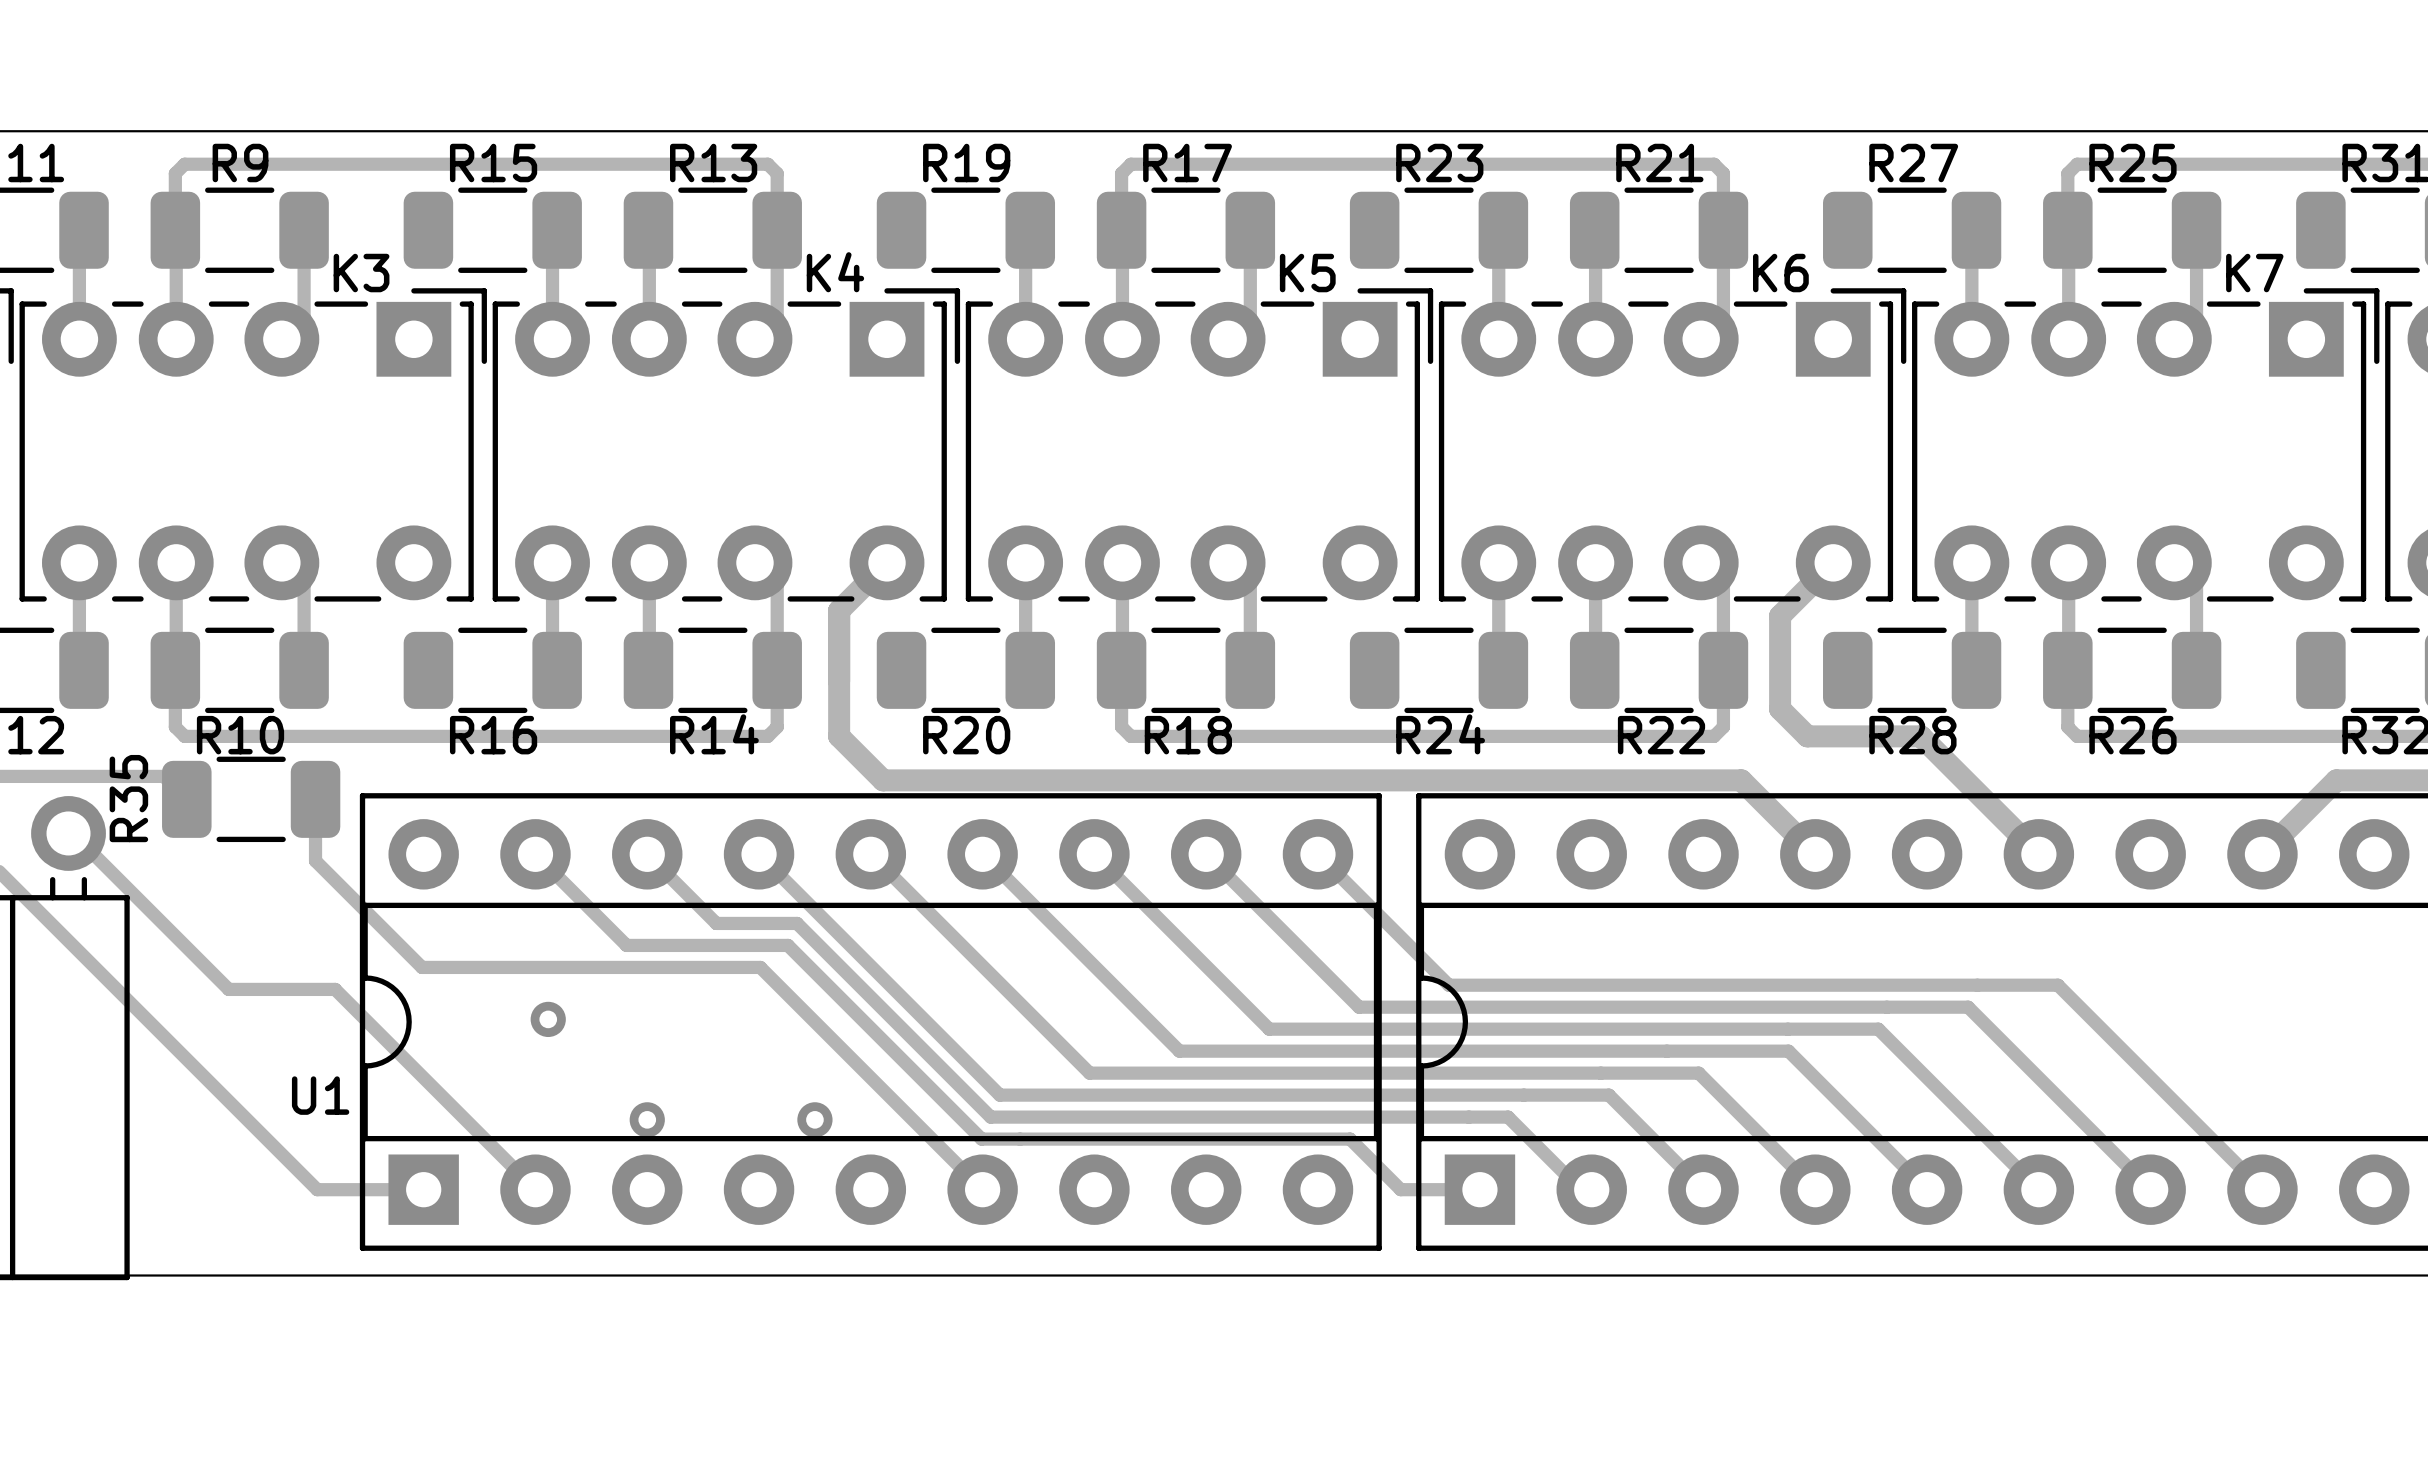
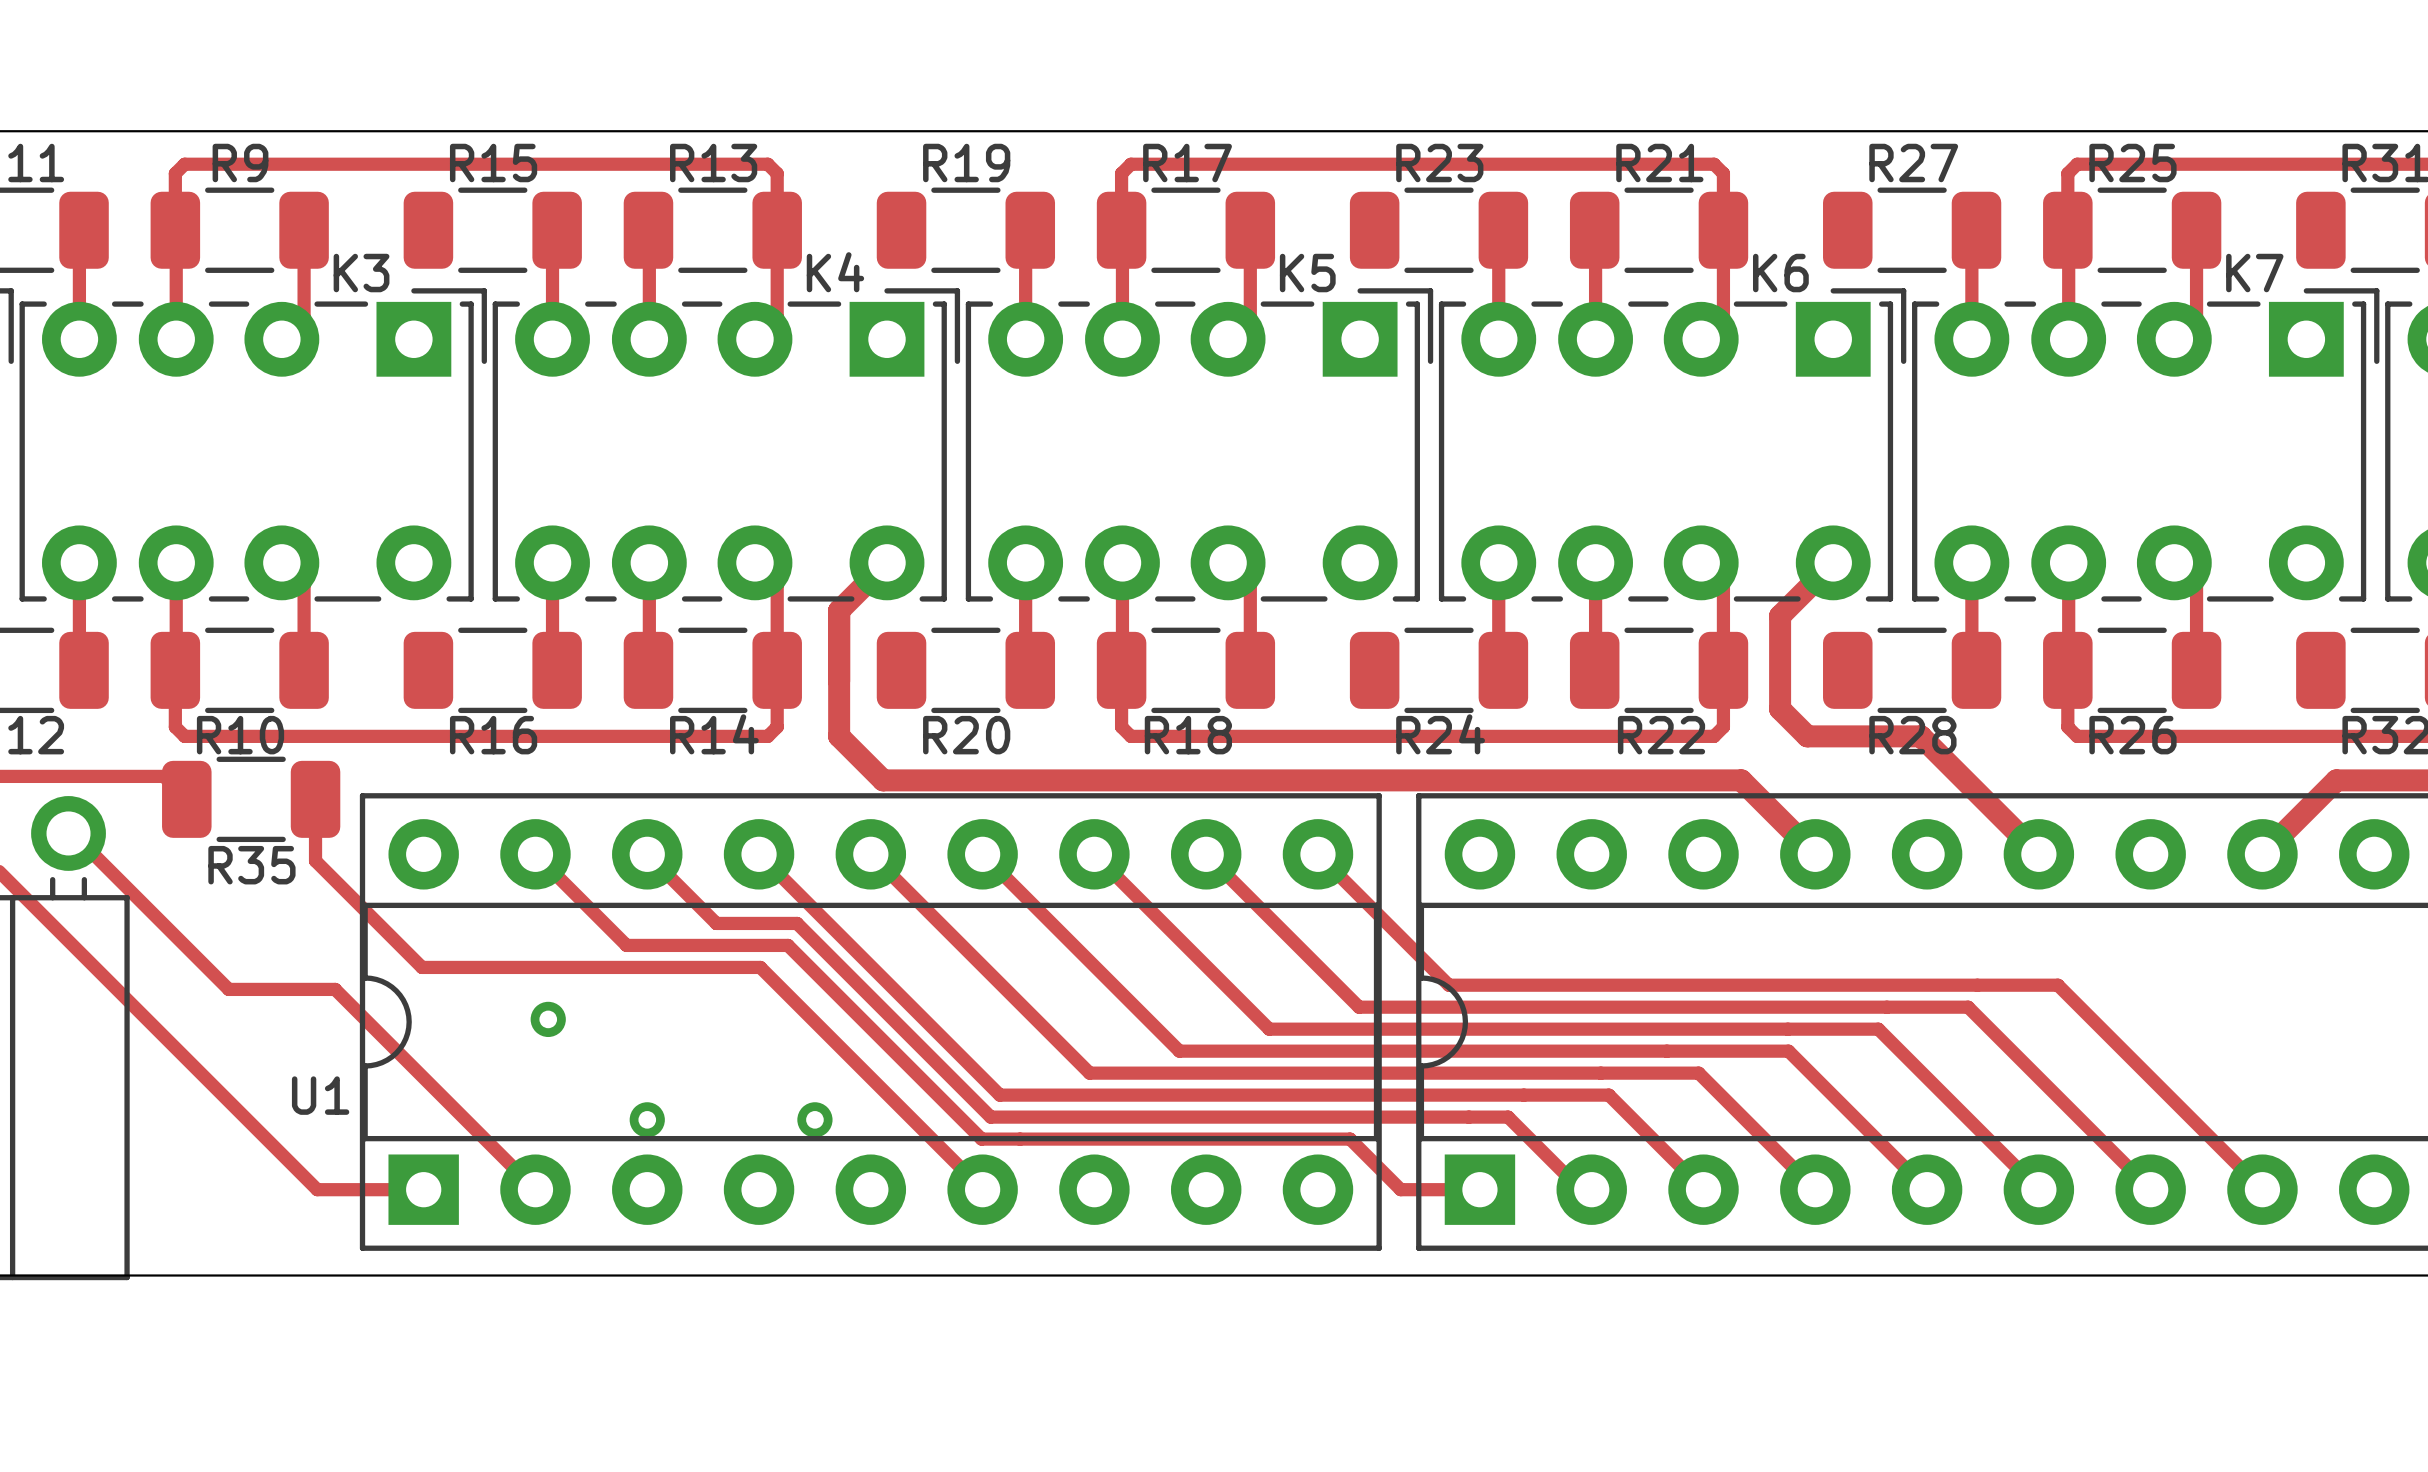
R35 name rotation: 0° (128, 798) -> 90° clockwise (251, 865)
R35 name position: R35 (128, 798) -> R35 (251, 865)

